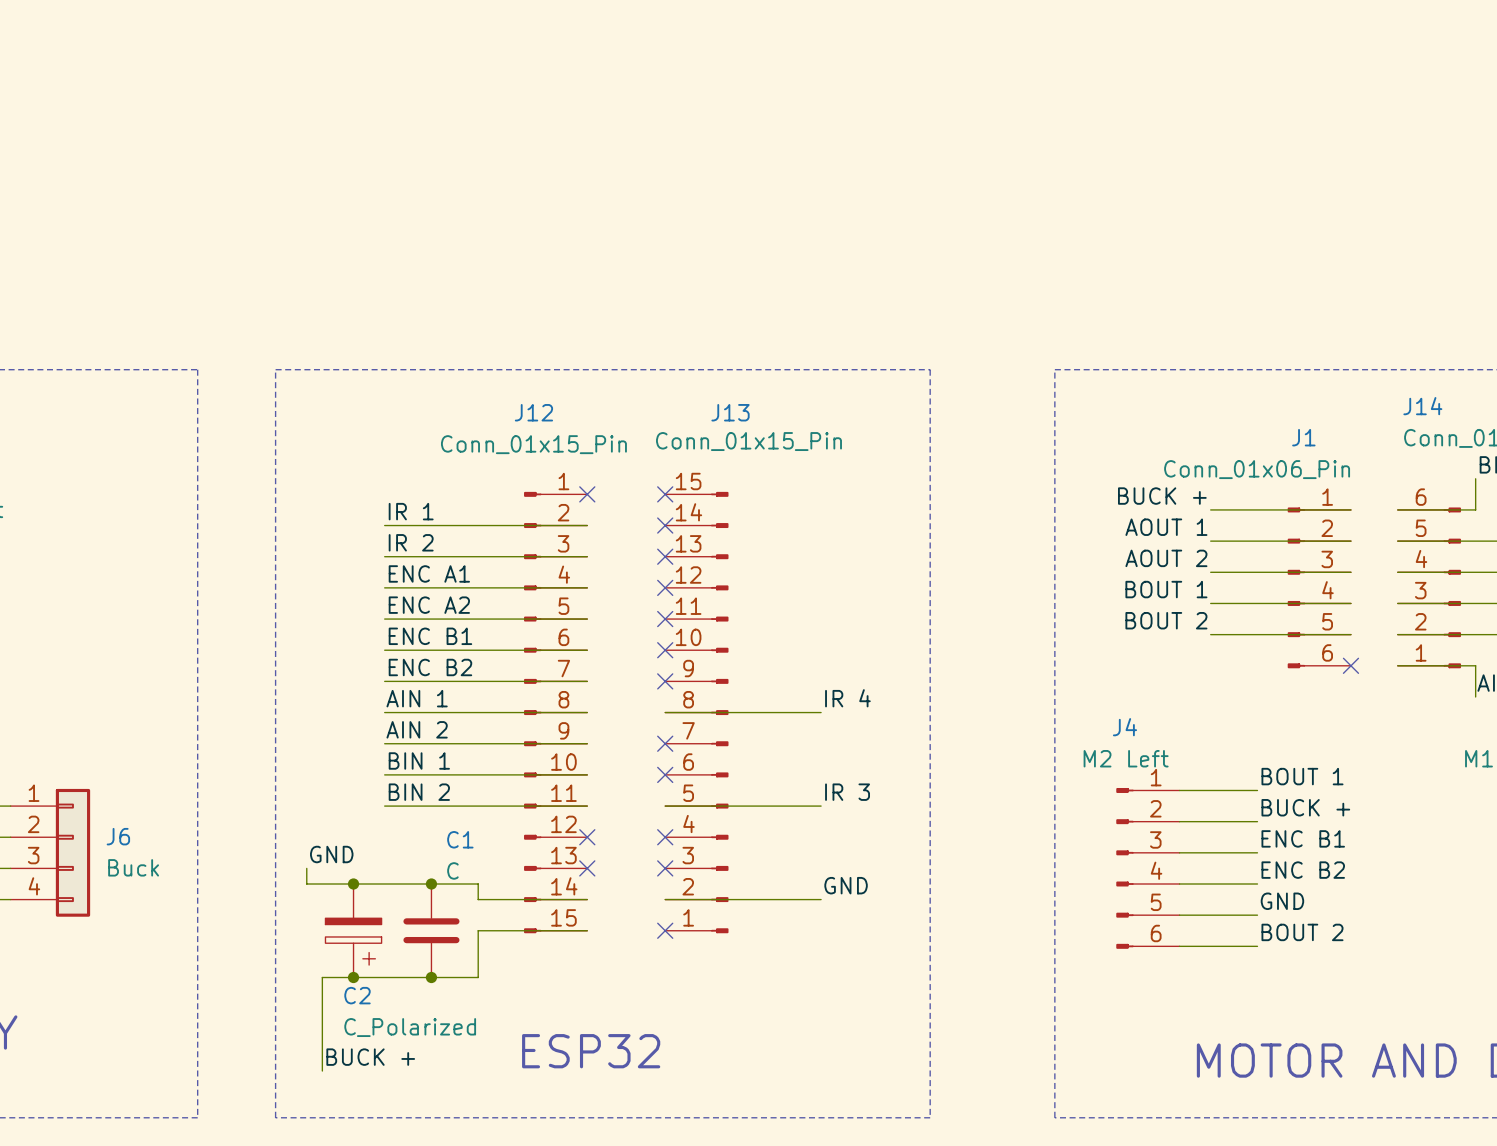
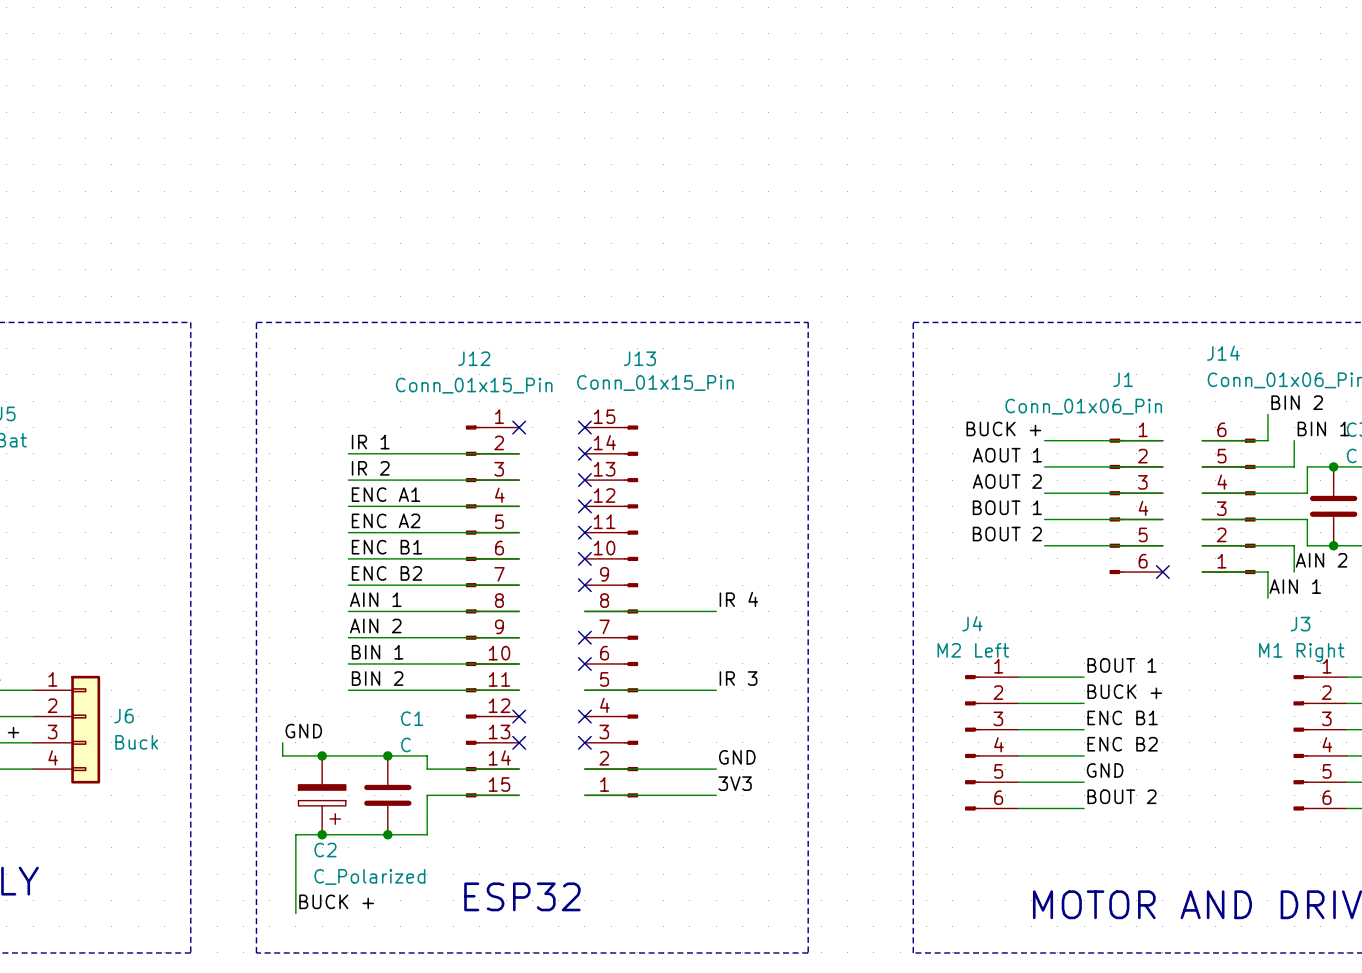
label: none -> 3V3 (735, 783)
wire: none -> (584, 795) (716, 795)
no-connect mark: (665, 930) -> none

